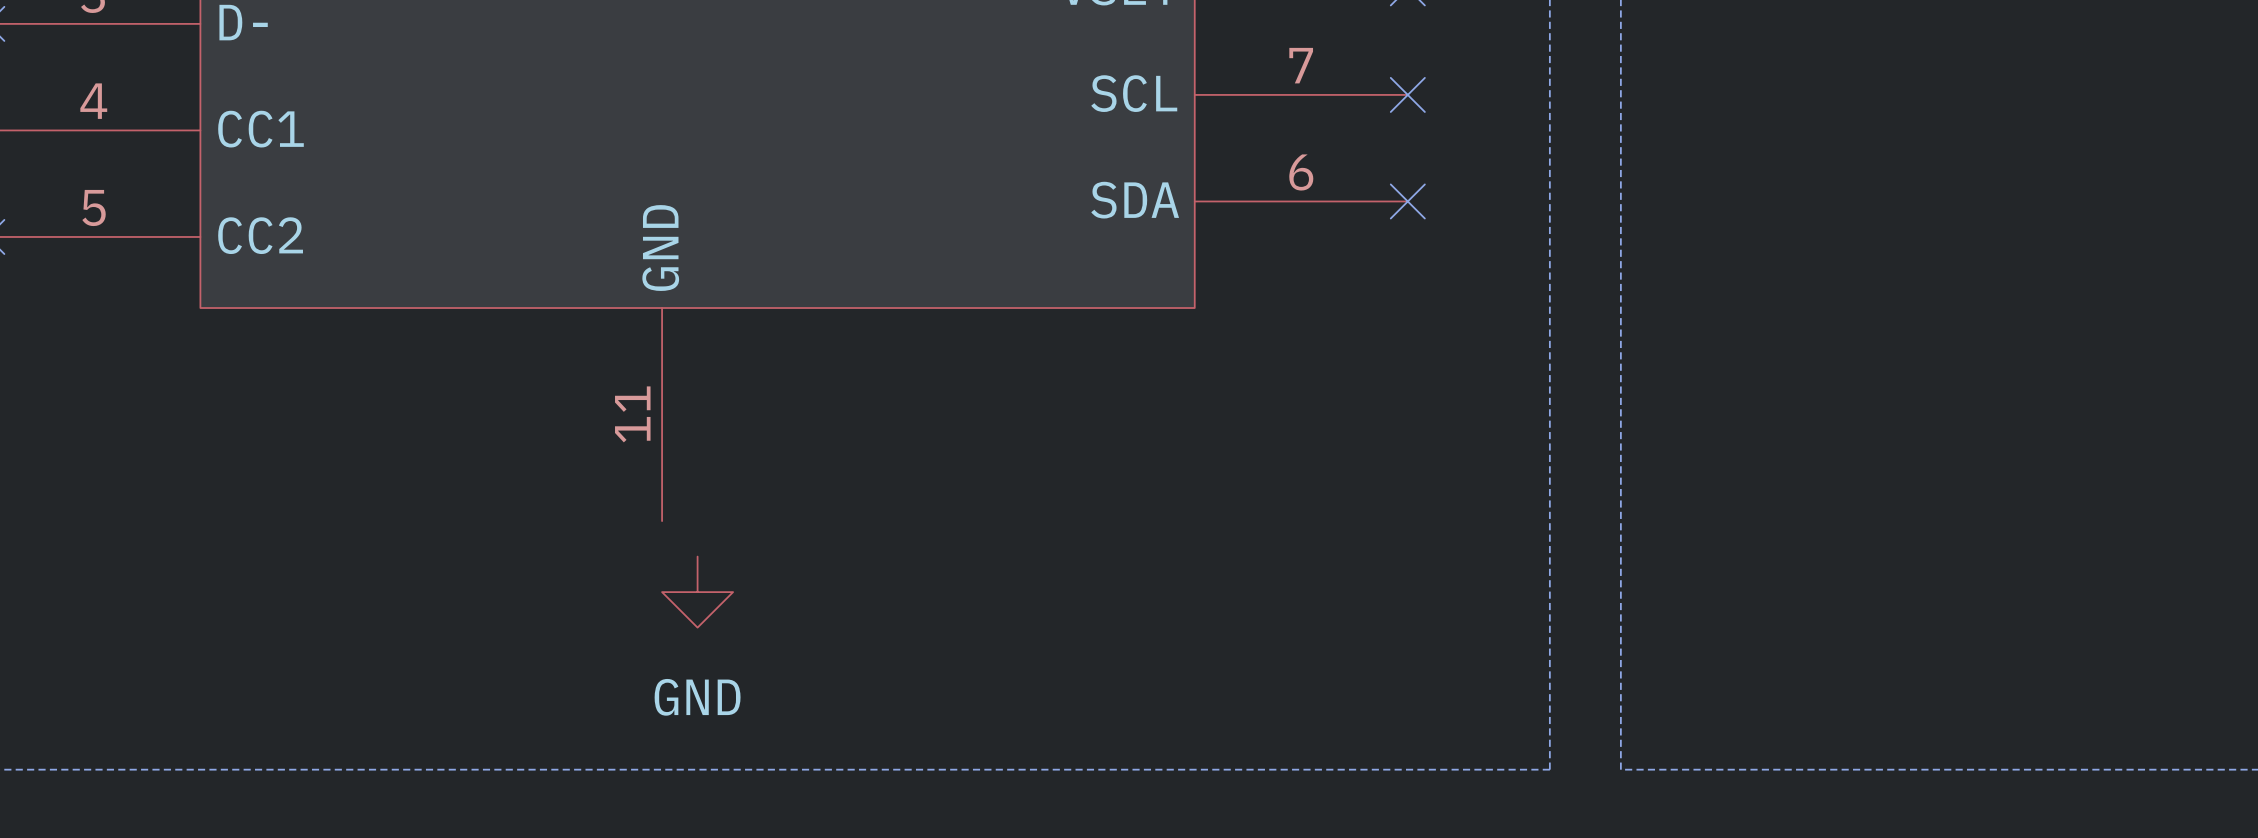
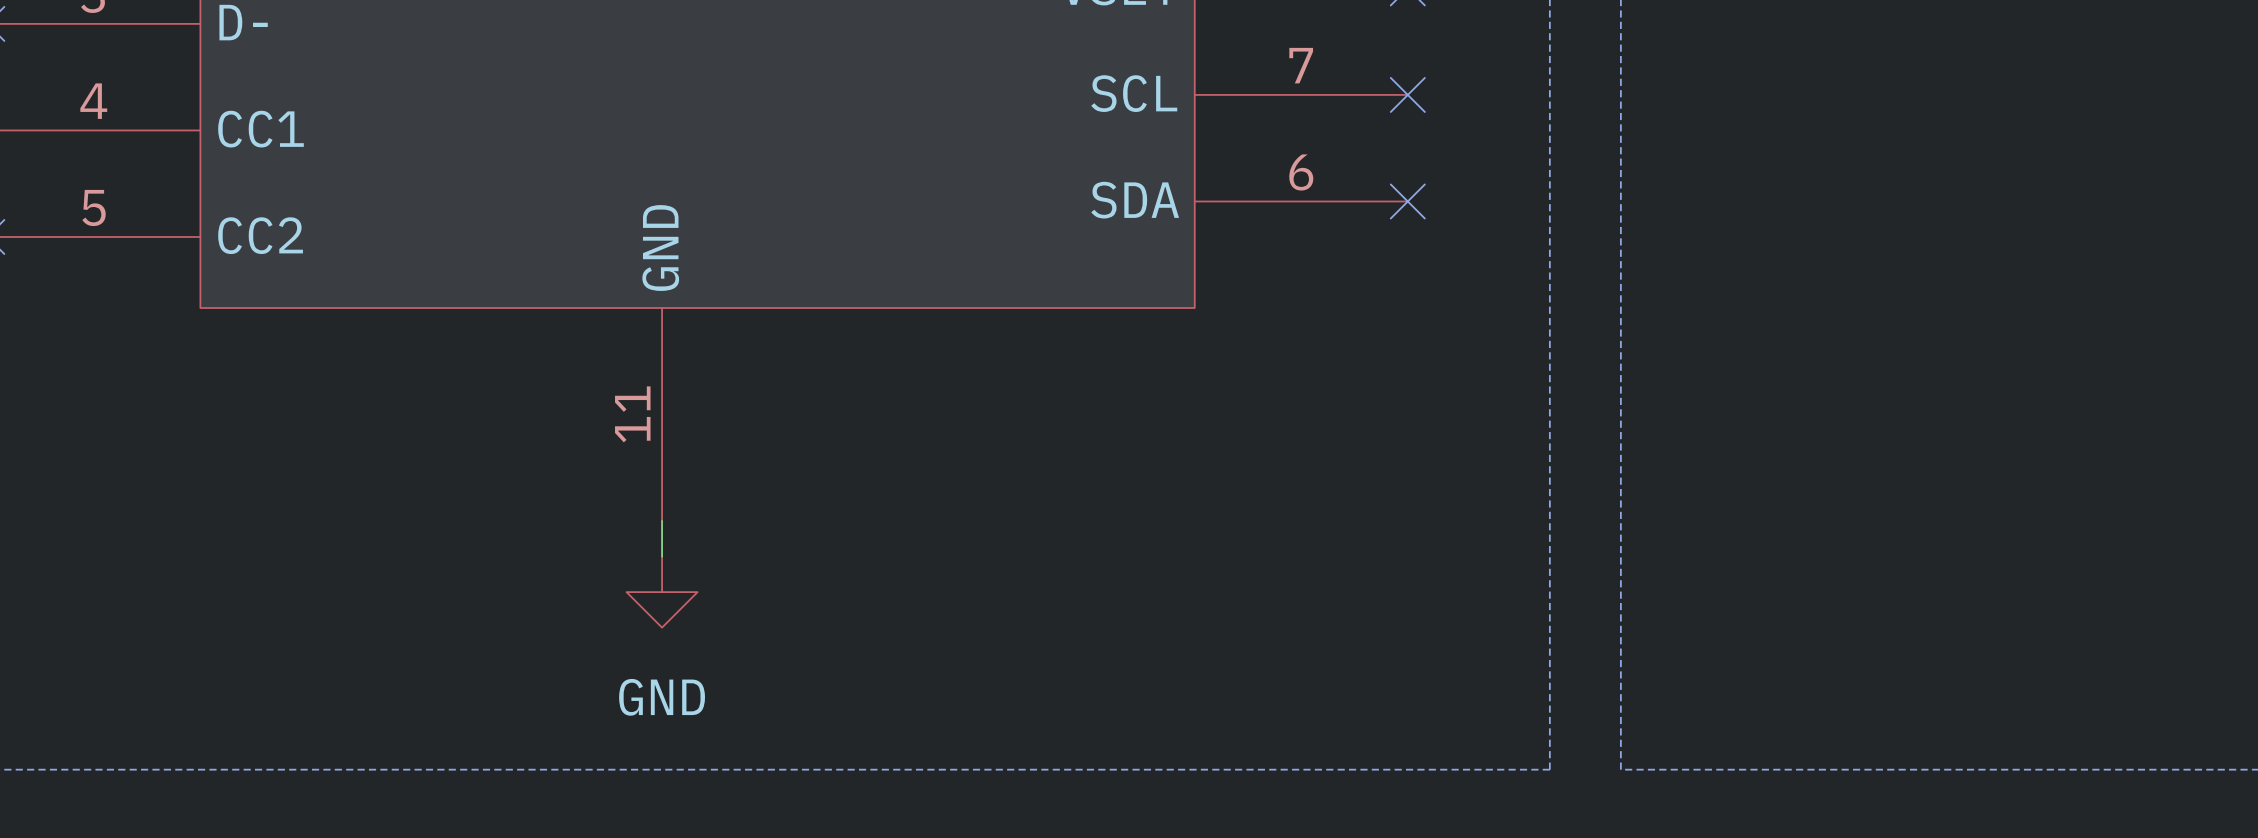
wire: none -> (662, 521) (662, 556)
power symbol position: GND (697, 592) -> GND (662, 592)

